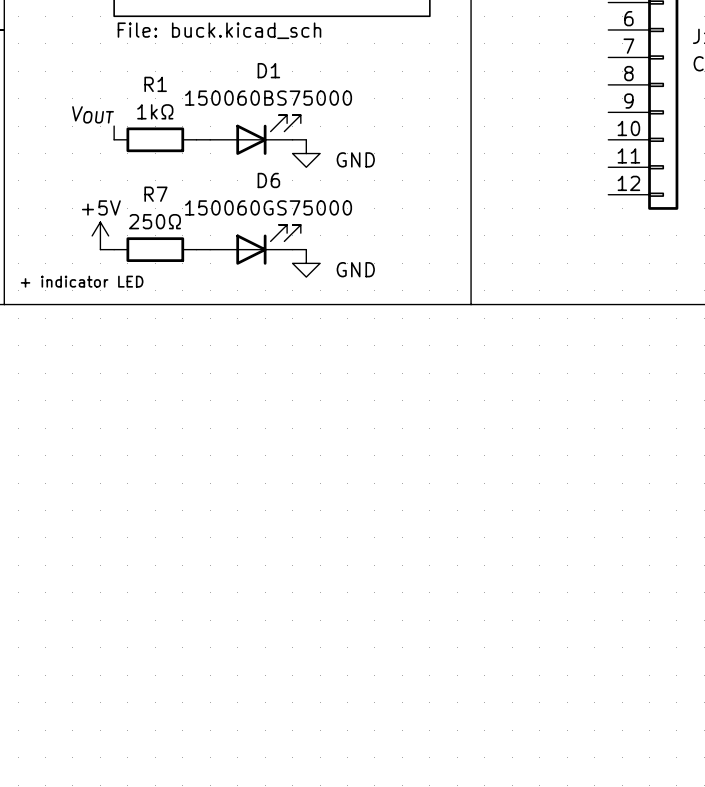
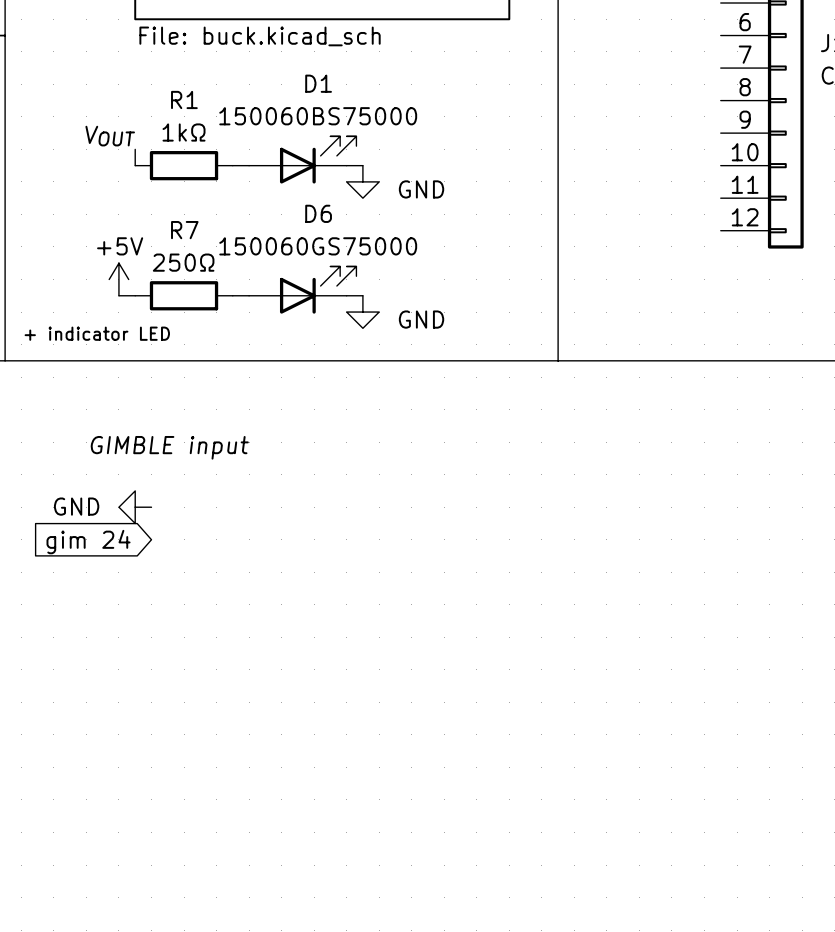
text: none -> GIMBLE input (169, 447)
power symbol: none -> GND (135, 507)
global label: none -> gim 24 (88, 542)

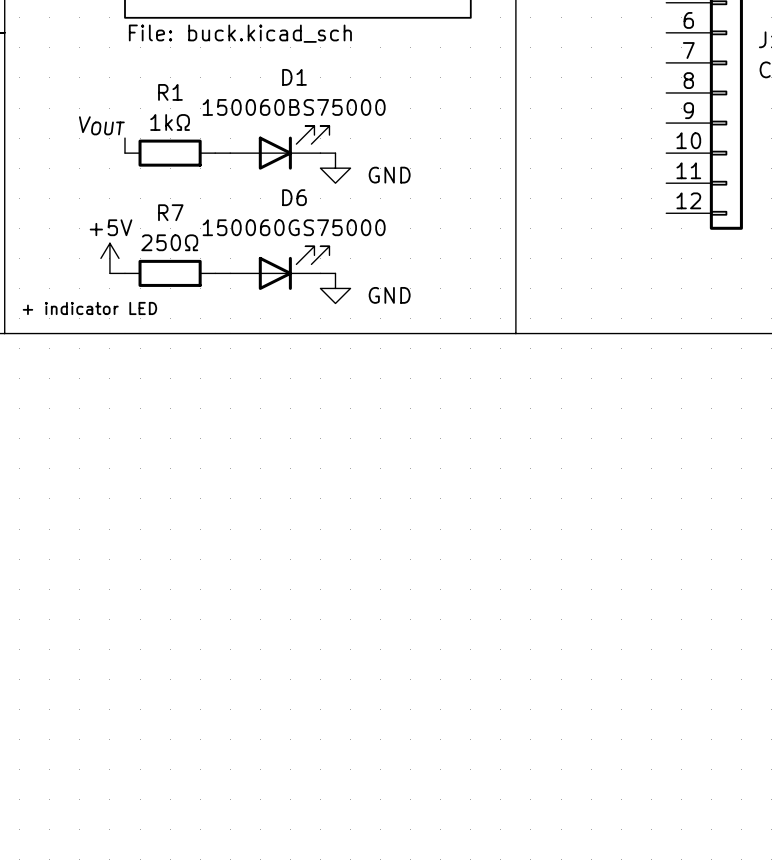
text: GIMBLE input (169, 447) -> none
power symbol: GND (135, 507) -> none
global label: gim 24 (88, 542) -> none

